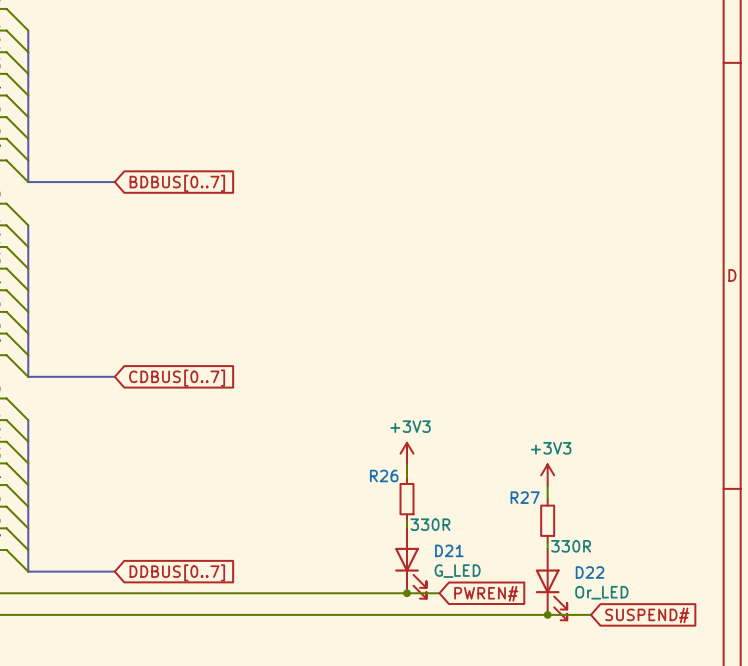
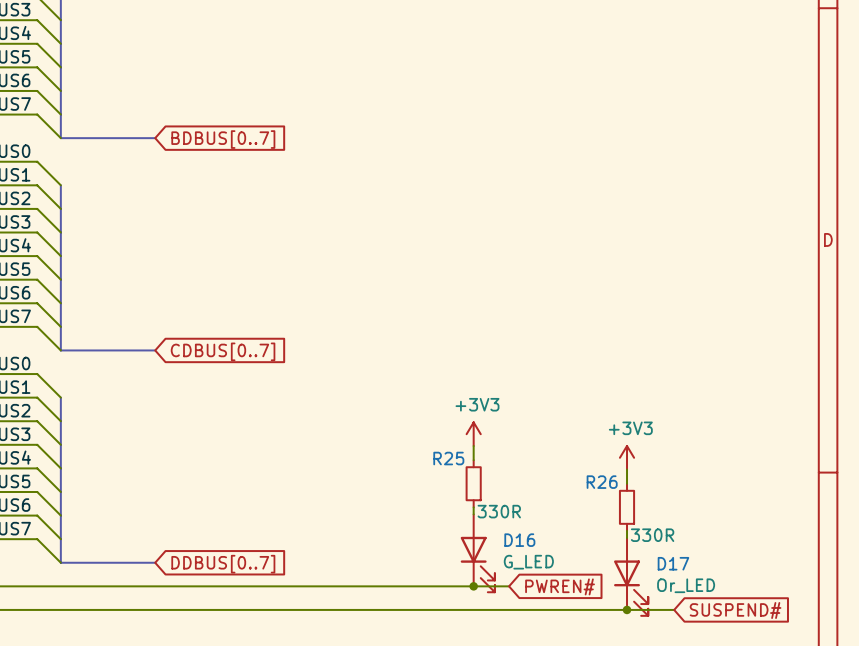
R26 name: R26 (384, 475) -> R25 (448, 458)
R27 name: R27 (525, 497) -> R26 (602, 482)
D21 name: D21 (449, 550) -> D16 (519, 540)
D22 name: D22 (590, 572) -> D17 (673, 563)

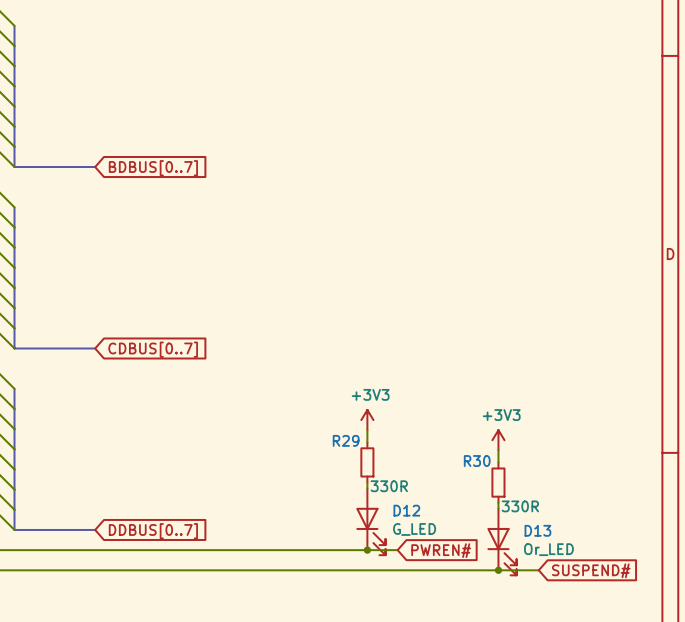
R25 name: R25 (448, 458) -> R29 (346, 440)
R26 name: R26 (602, 482) -> R30 (477, 461)
D16 name: D16 (519, 540) -> D12 (406, 510)
D17 name: D17 (673, 563) -> D13 (537, 530)

